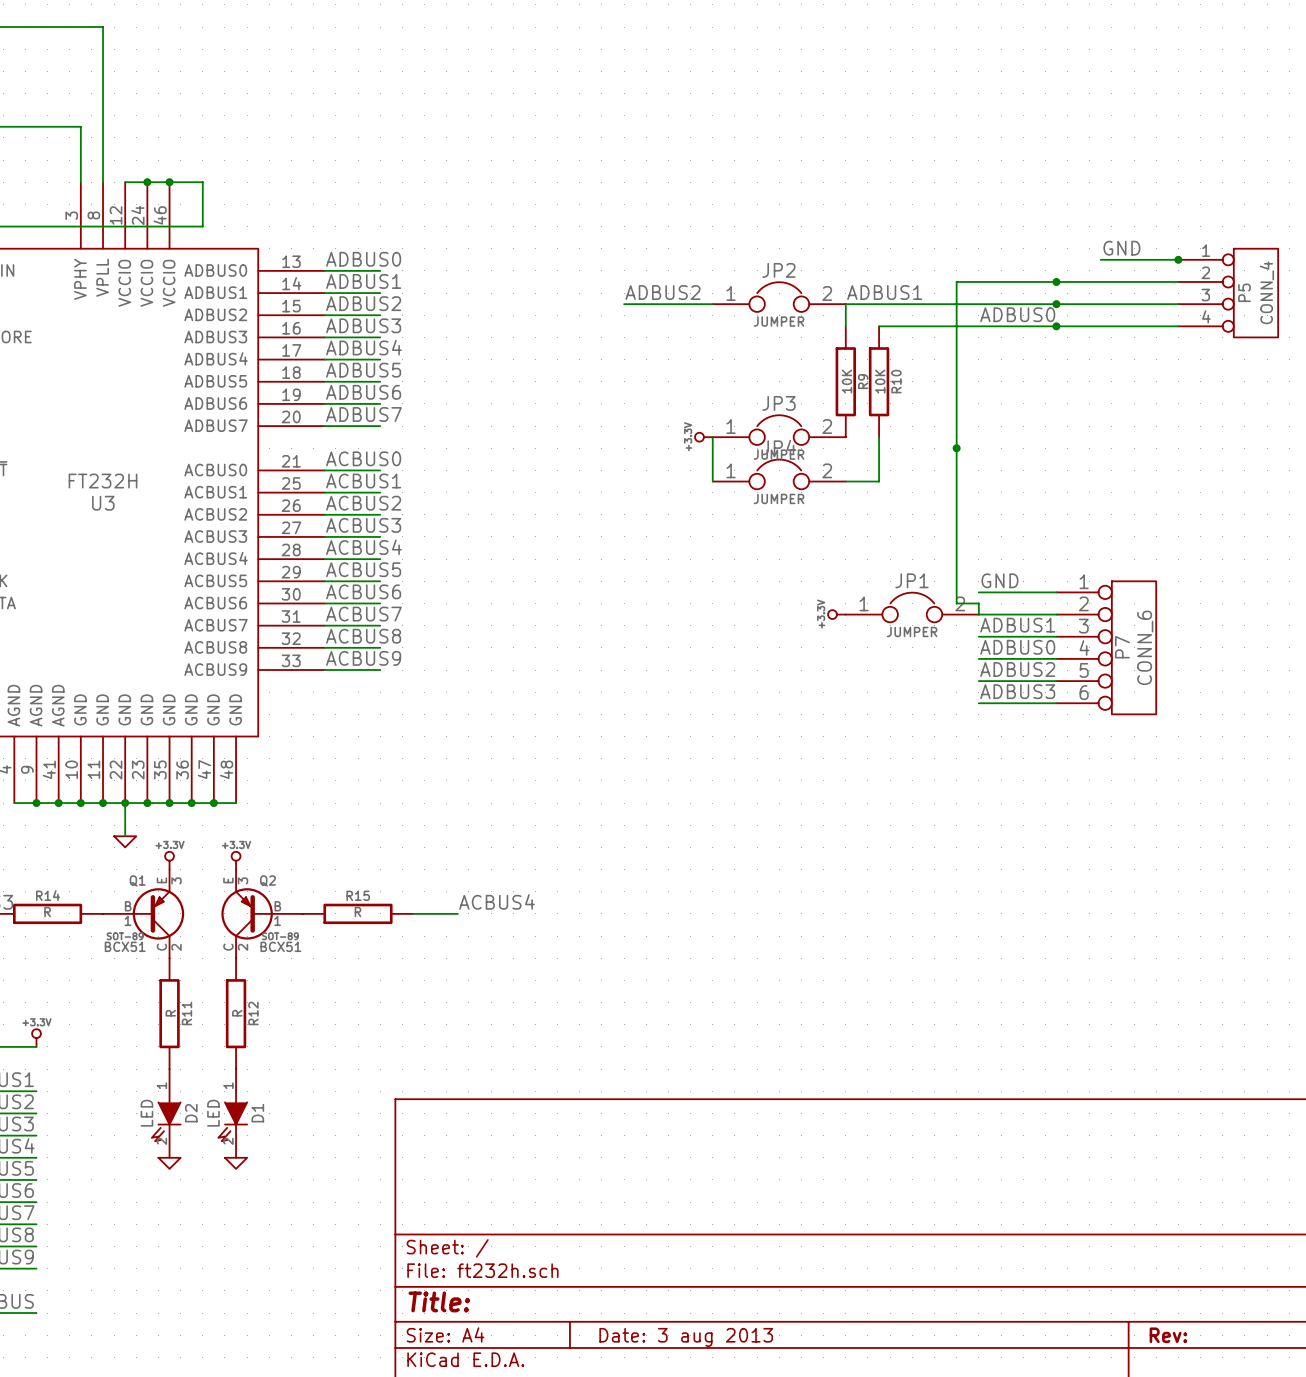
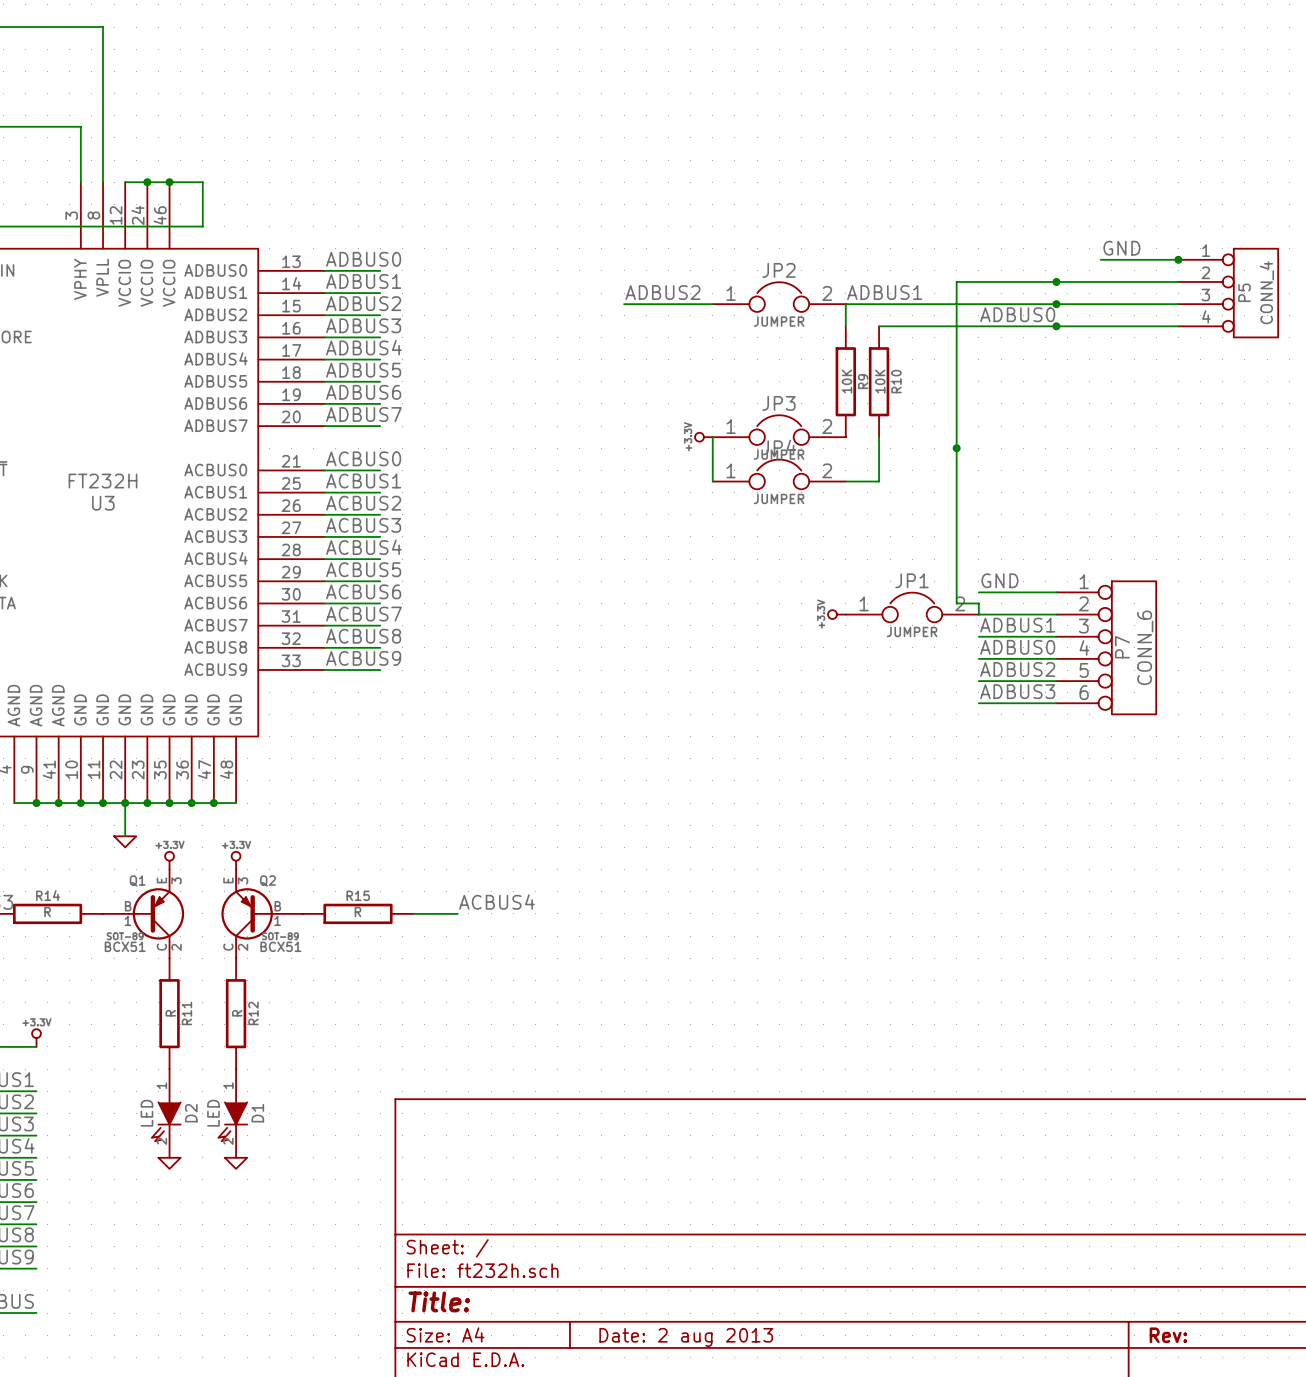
title block: Date: 3 aug 2013 (686, 1337) -> Date: 2 aug 2013 (686, 1337)

